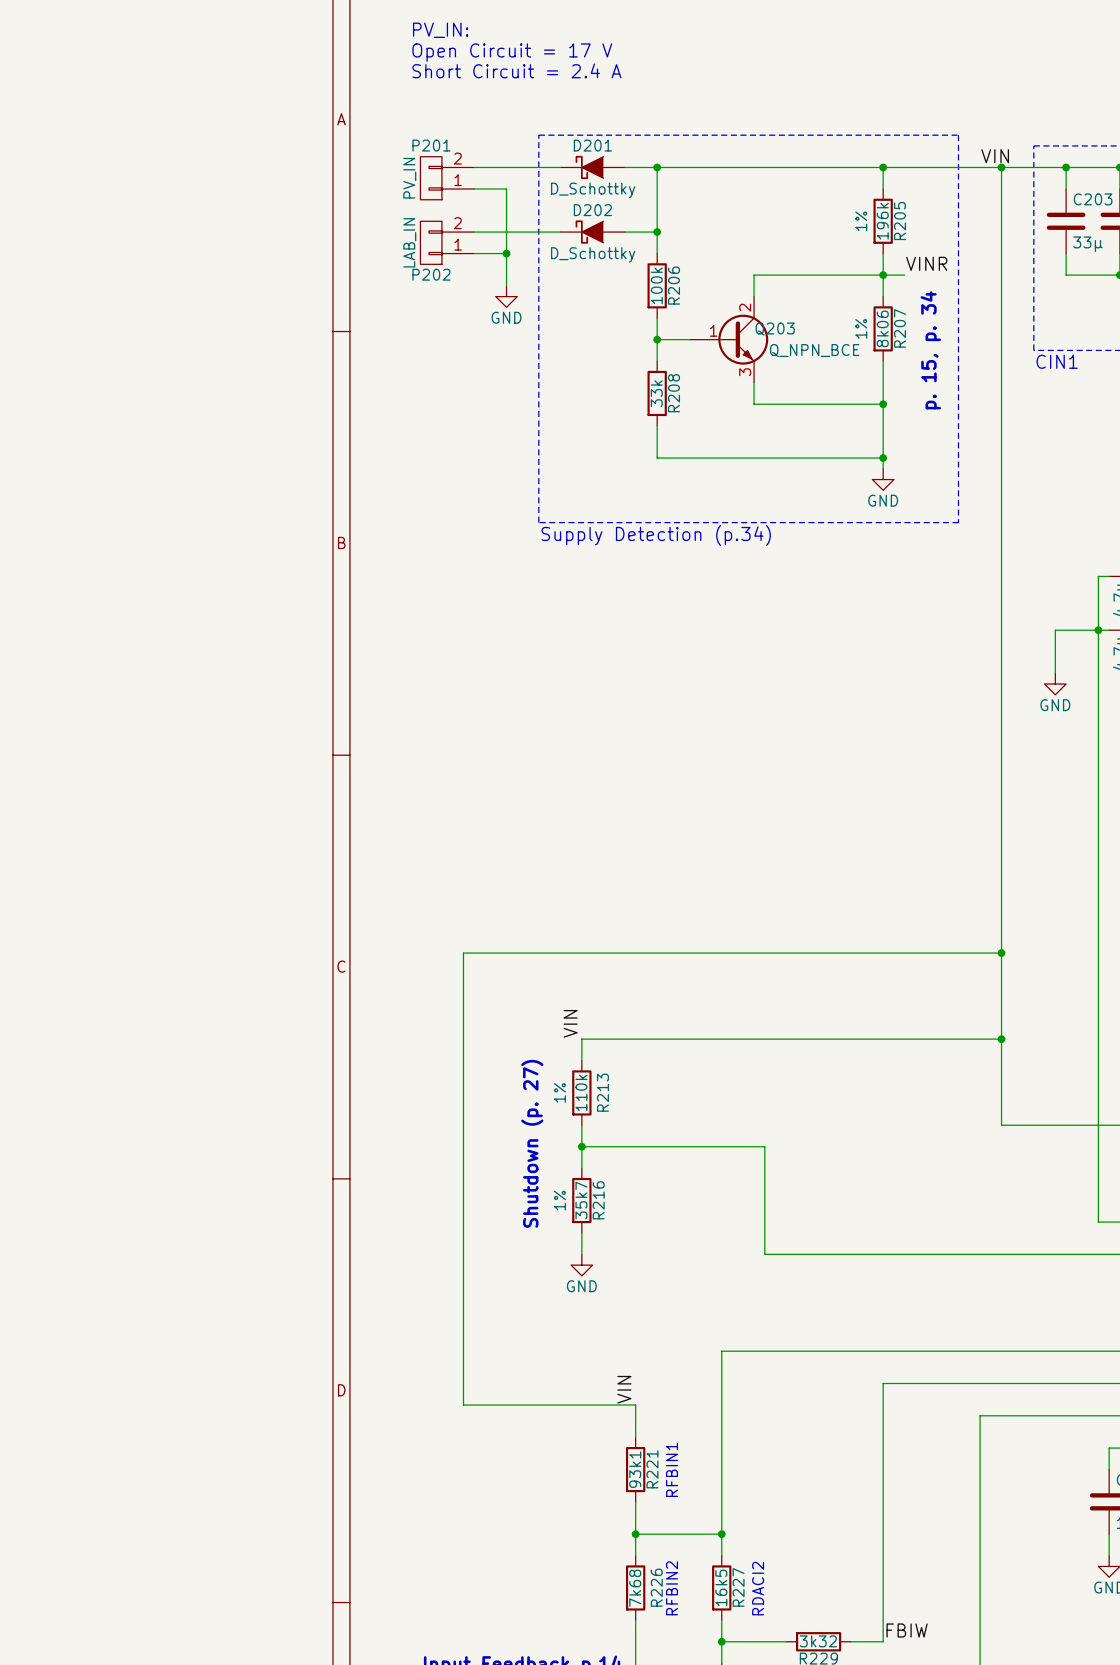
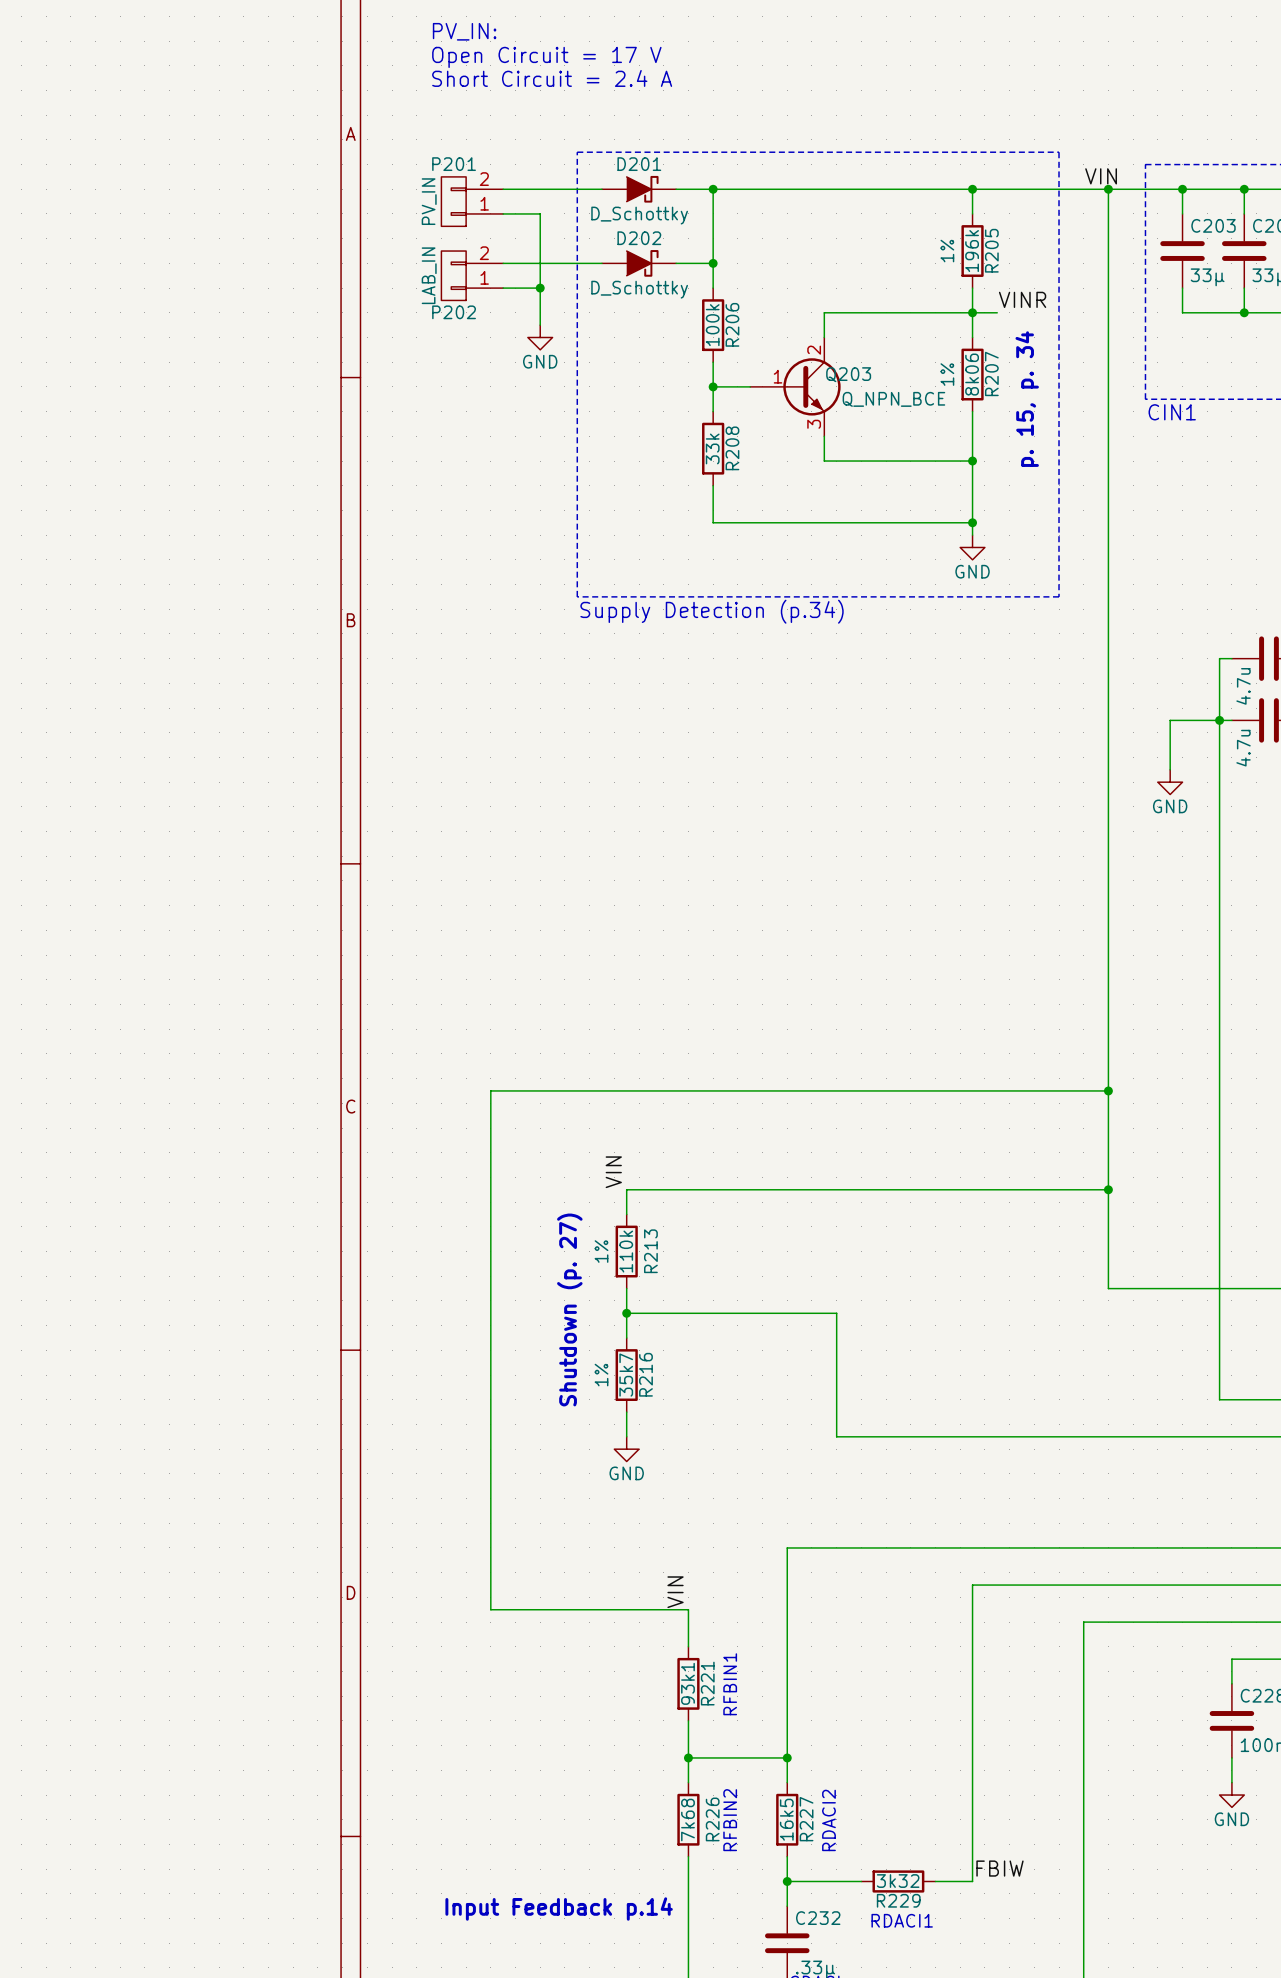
D201 flip: as is (589, 167) -> left-right (642, 189)
D202 flip: as is (589, 232) -> left-right (642, 263)

